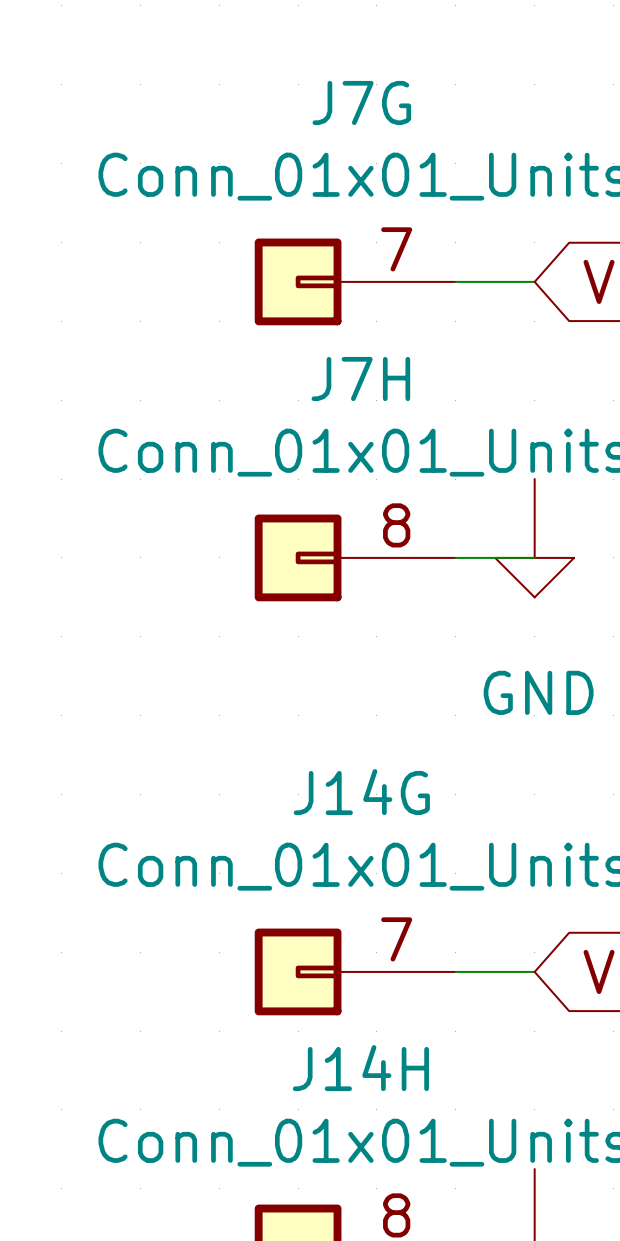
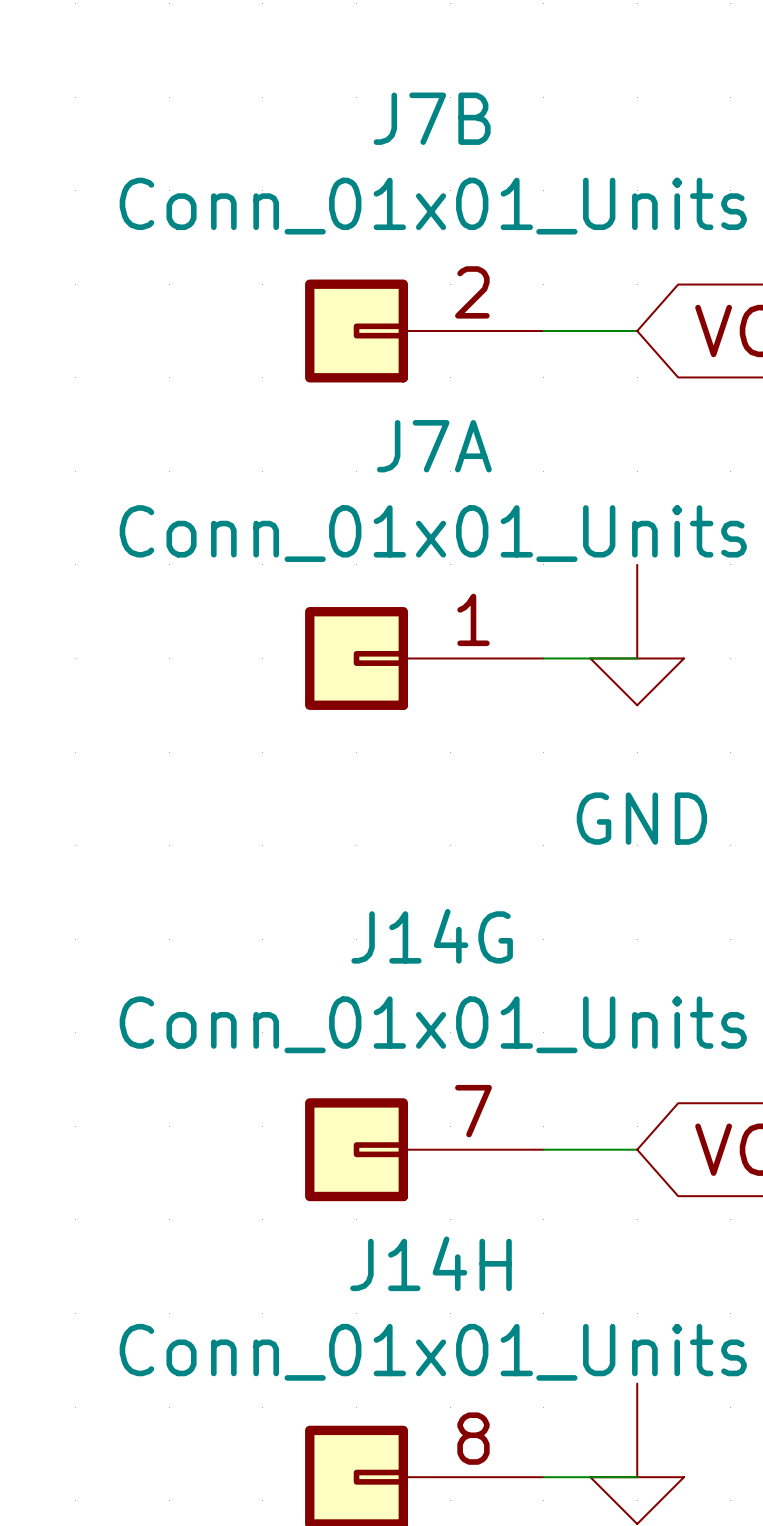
J7G name: J7G (361, 102) -> J7B (432, 118)
J7G pin number: 7 (396, 249) -> 2 (472, 292)
J7H name: J7H (360, 379) -> J7A (434, 446)
J7H pin number: 8 (396, 525) -> 1 (473, 619)

